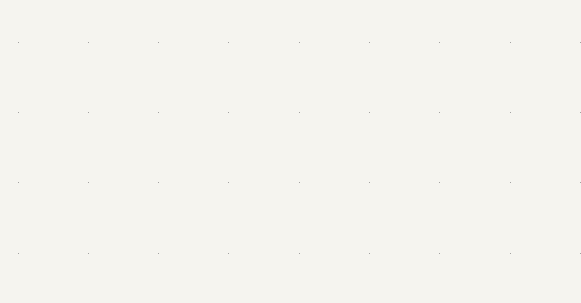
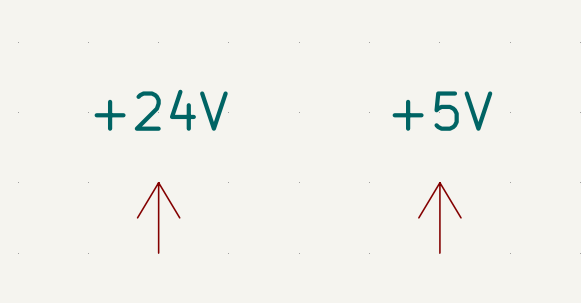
power symbol: none -> +24V (158, 217)
power symbol: none -> +5V (439, 217)

